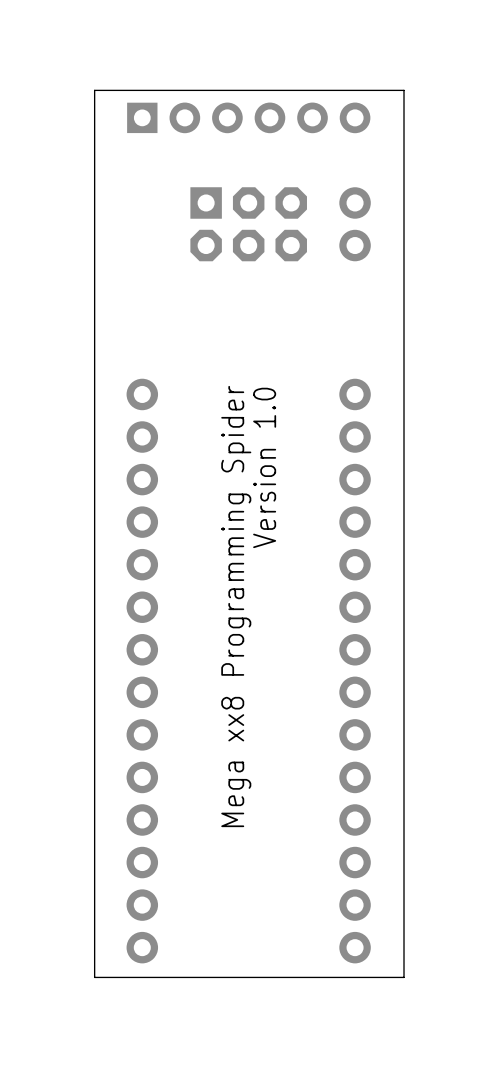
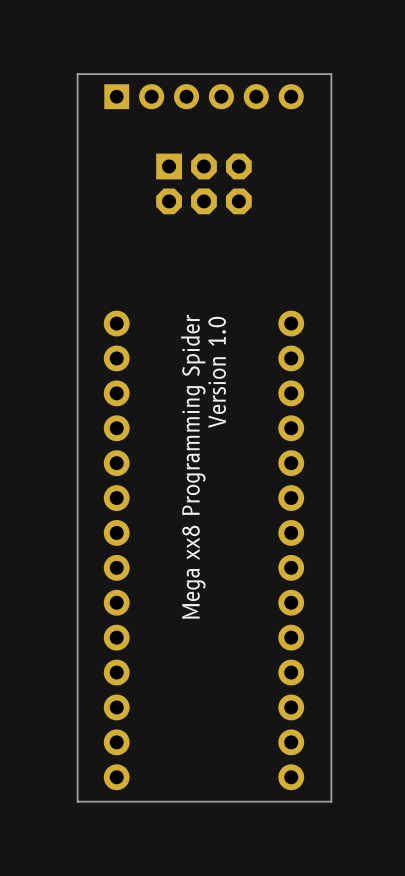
part: (355, 224) -> none

